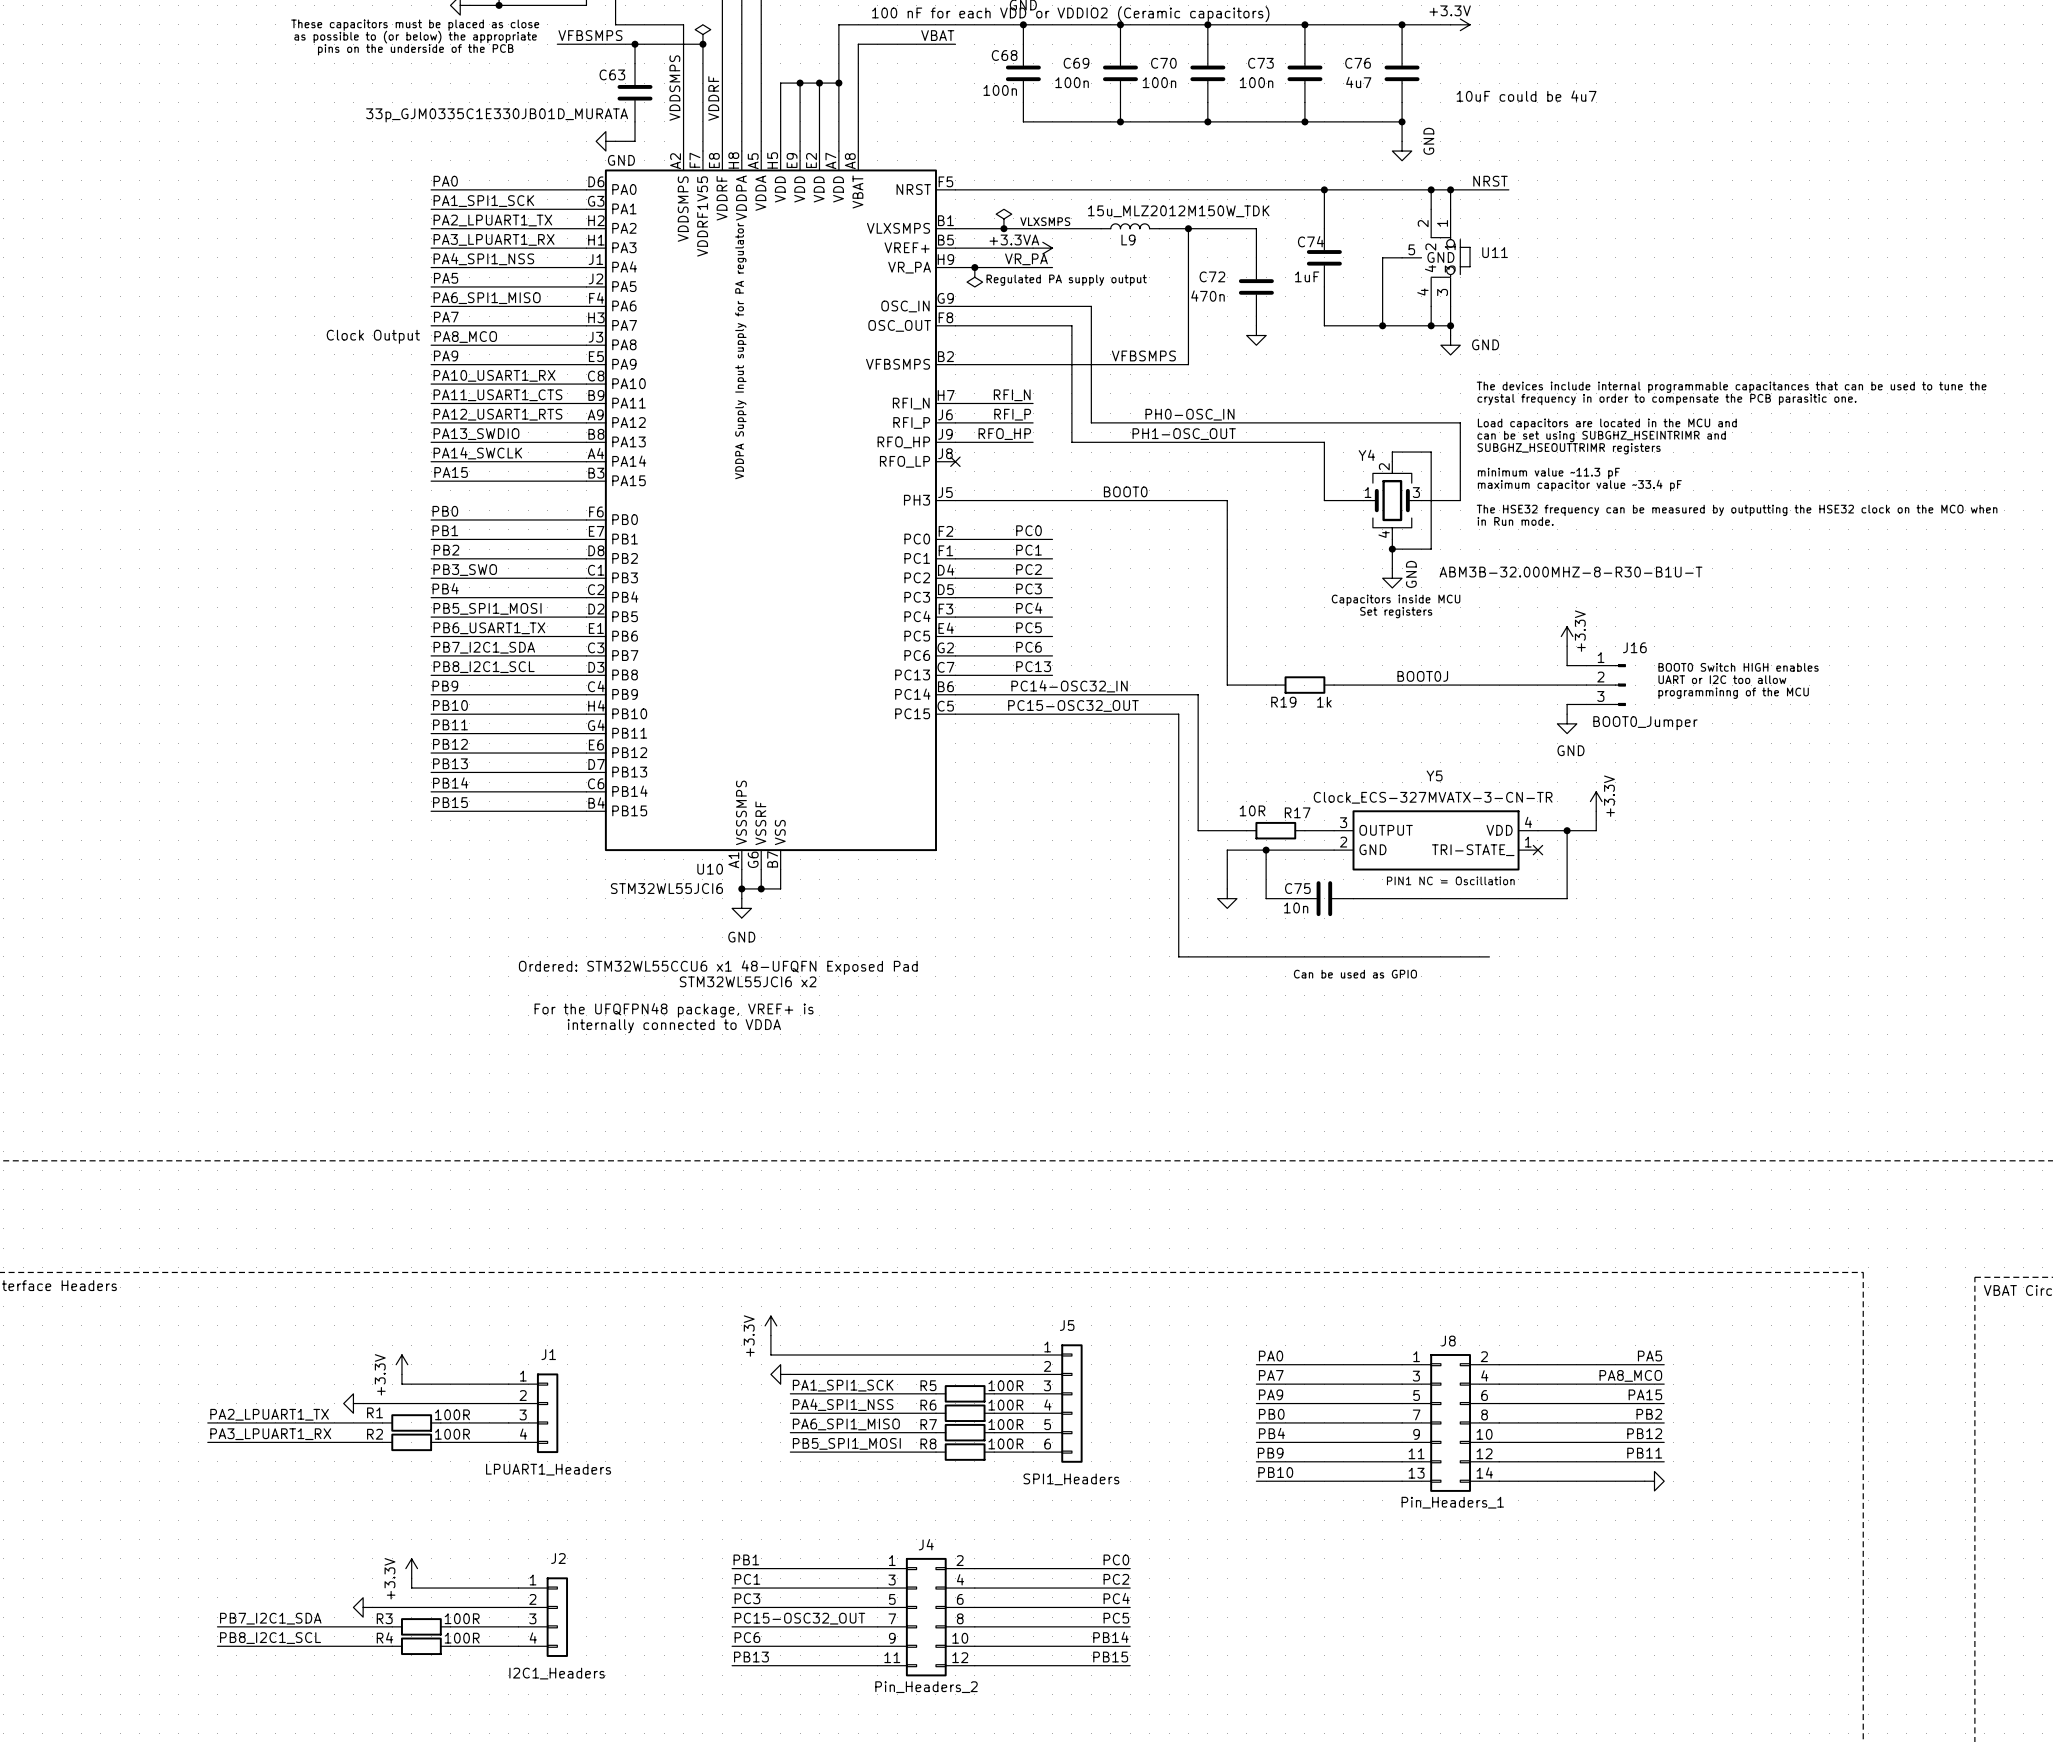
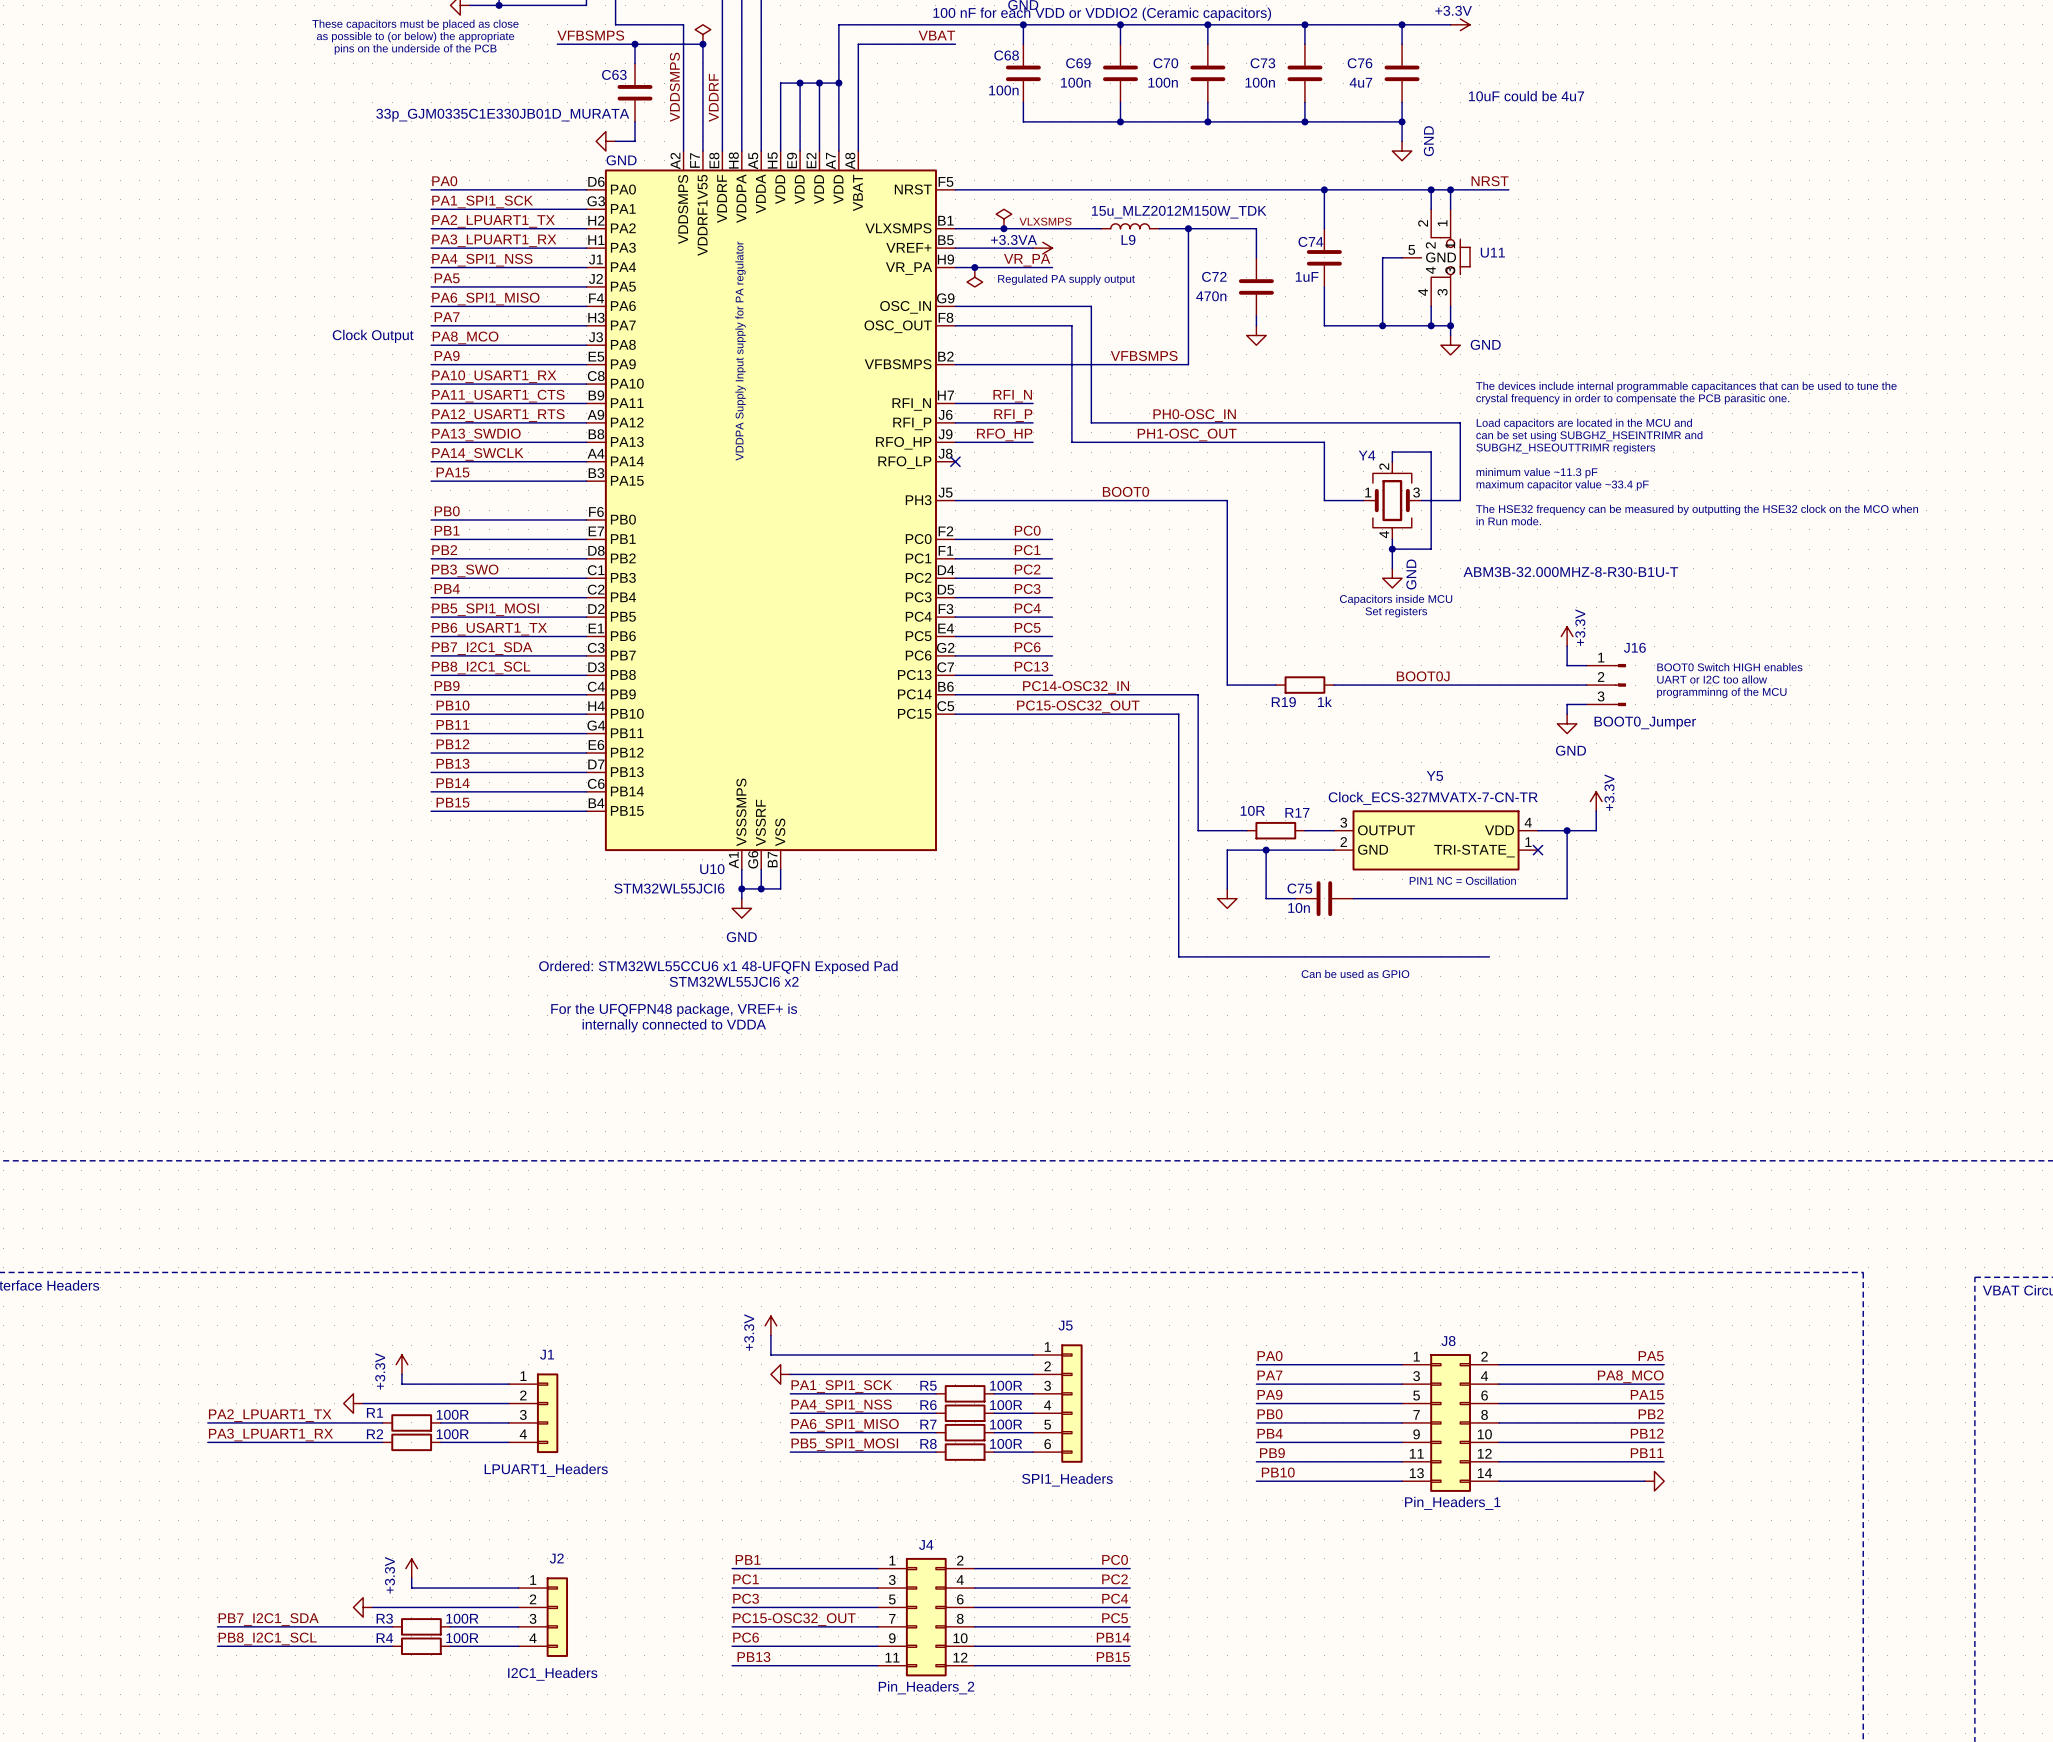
Y5 value: Clock_ECS-327MVATX-3-CN-TR (1433, 797) -> Clock_ECS-327MVATX-7-CN-TR (1433, 798)

